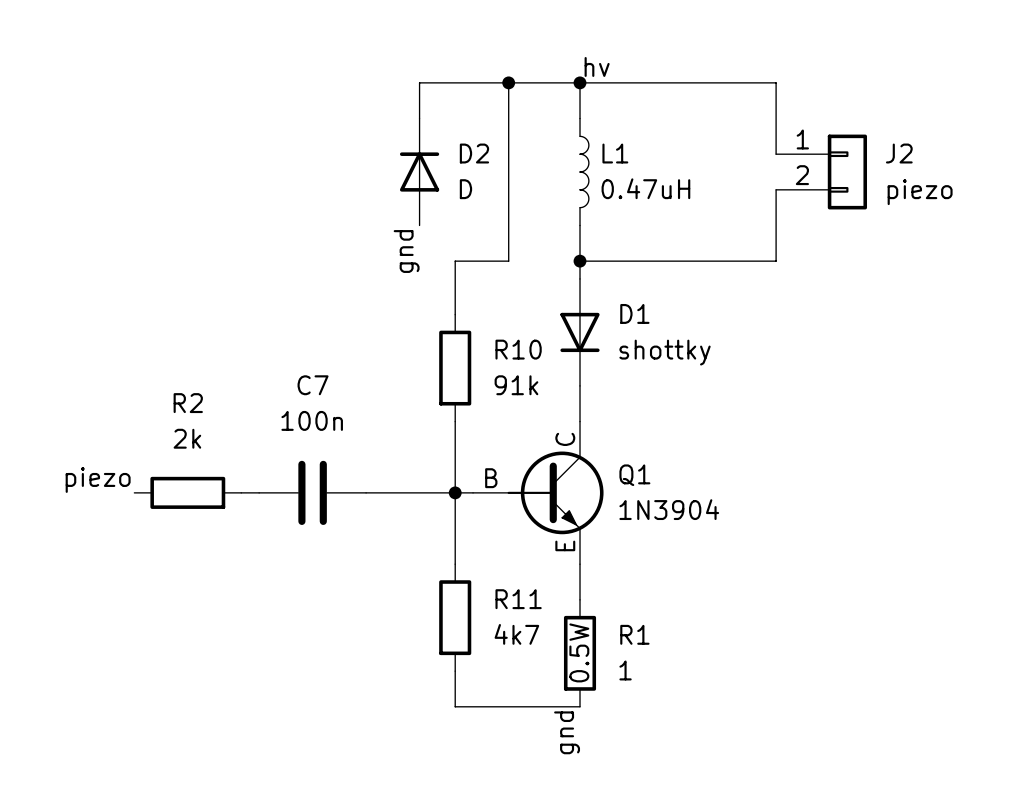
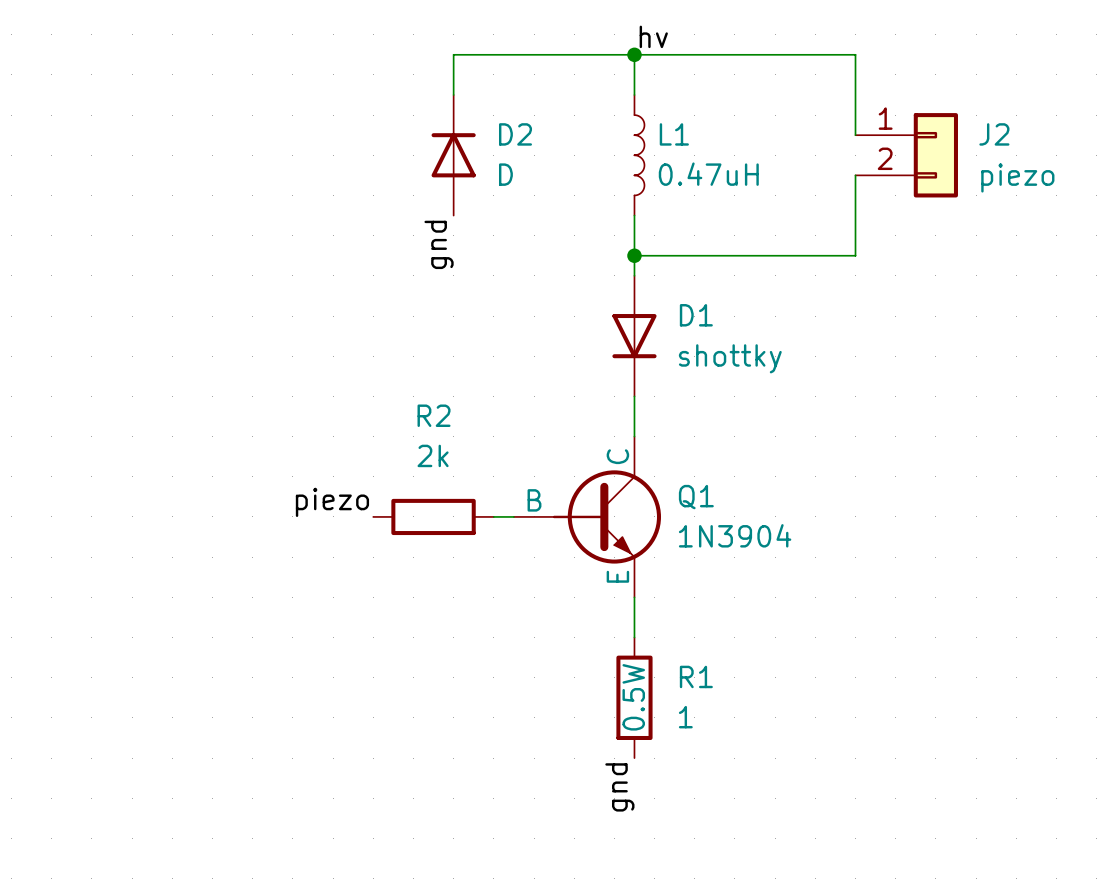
wire: (508, 82) (508, 261) (455, 261) (455, 314) -> none
junction: (508, 82) -> none
R10: 91k (455, 368) -> none
wire: (455, 421) (455, 564) -> none
label position: piezo (98, 479) -> piezo (332, 502)
R2 position: (187, 492) -> (433, 516)
wire: (241, 492) (259, 492) -> none
C7: 100n (312, 492) -> none
wire: (366, 492) (455, 492) -> none
junction: (455, 492) -> none
R11: 4k7 (455, 617) -> none
wire: (455, 671) (455, 706) (580, 706) -> none

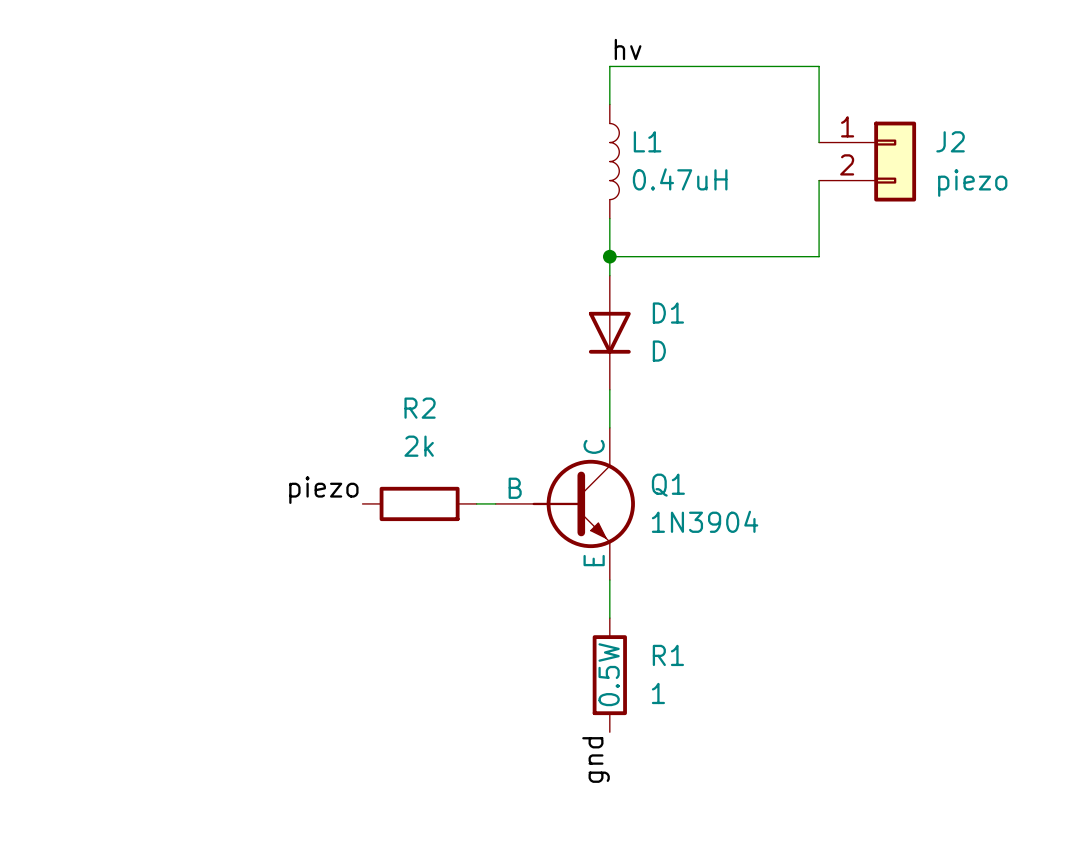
wire: (634, 54) (453, 54) (453, 95) -> none
junction: (634, 54) -> none
D2: D (453, 155) -> none
label: gnd (439, 244) -> none
D1 value: shottky (730, 358) -> D (659, 351)

